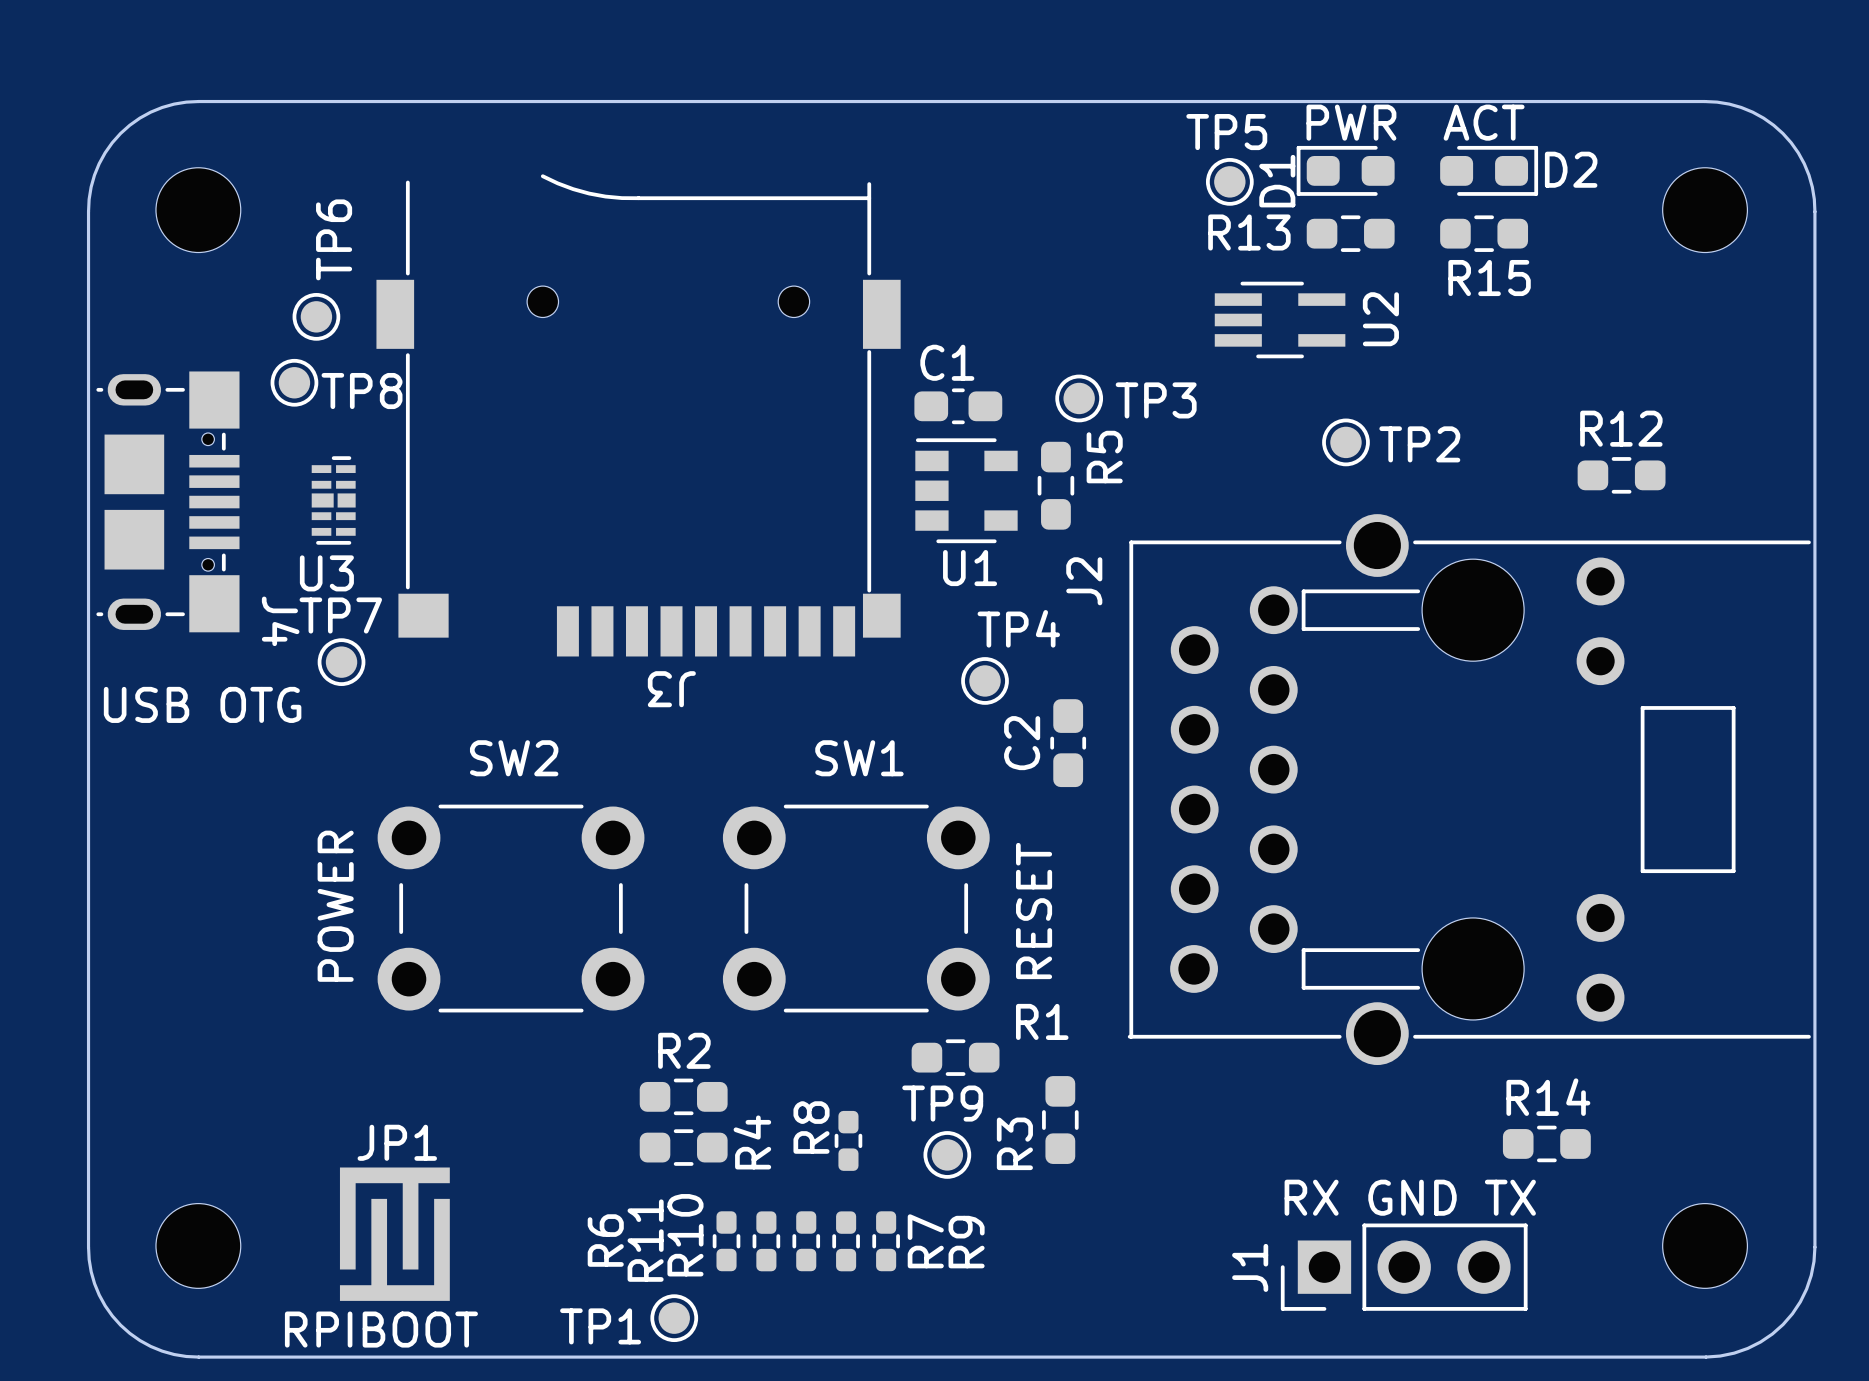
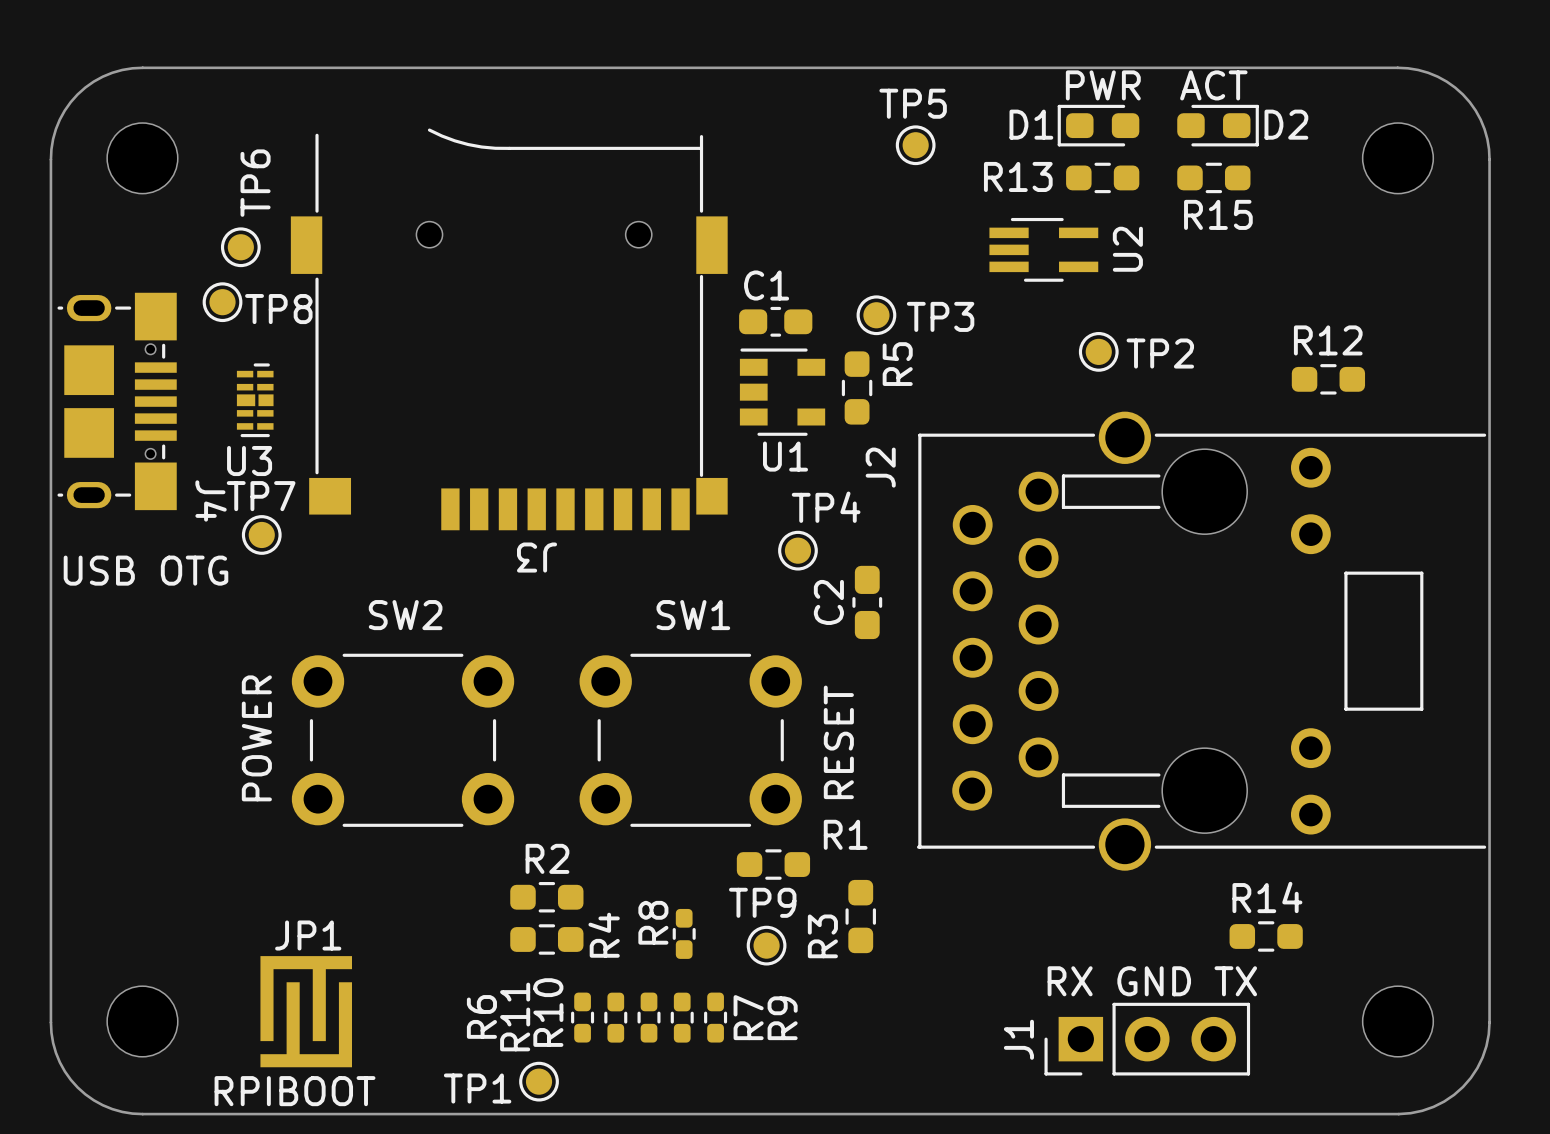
TP5 position: (1229, 181) -> (915, 145)
D1 name rotation: 0° (1277, 181) -> 90° clockwise (1031, 124)

